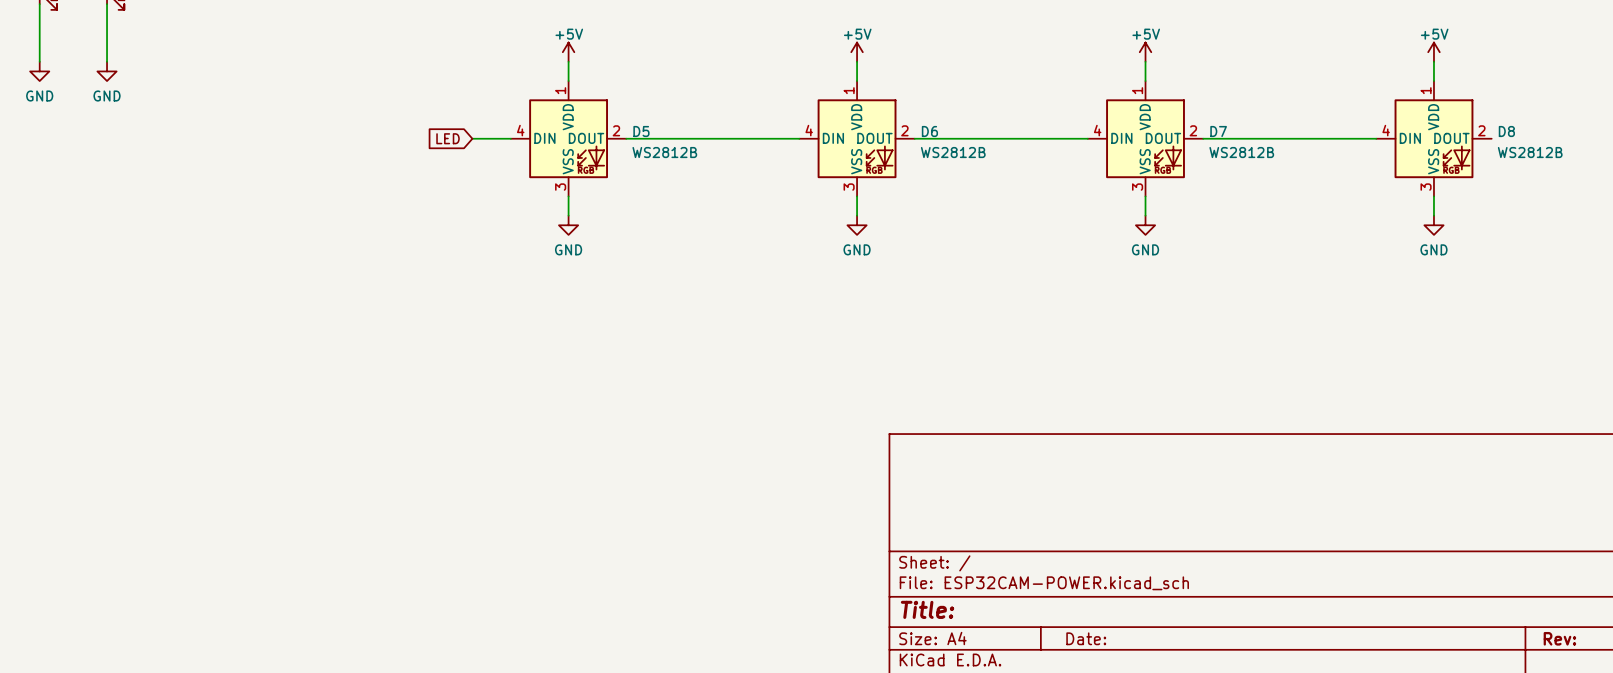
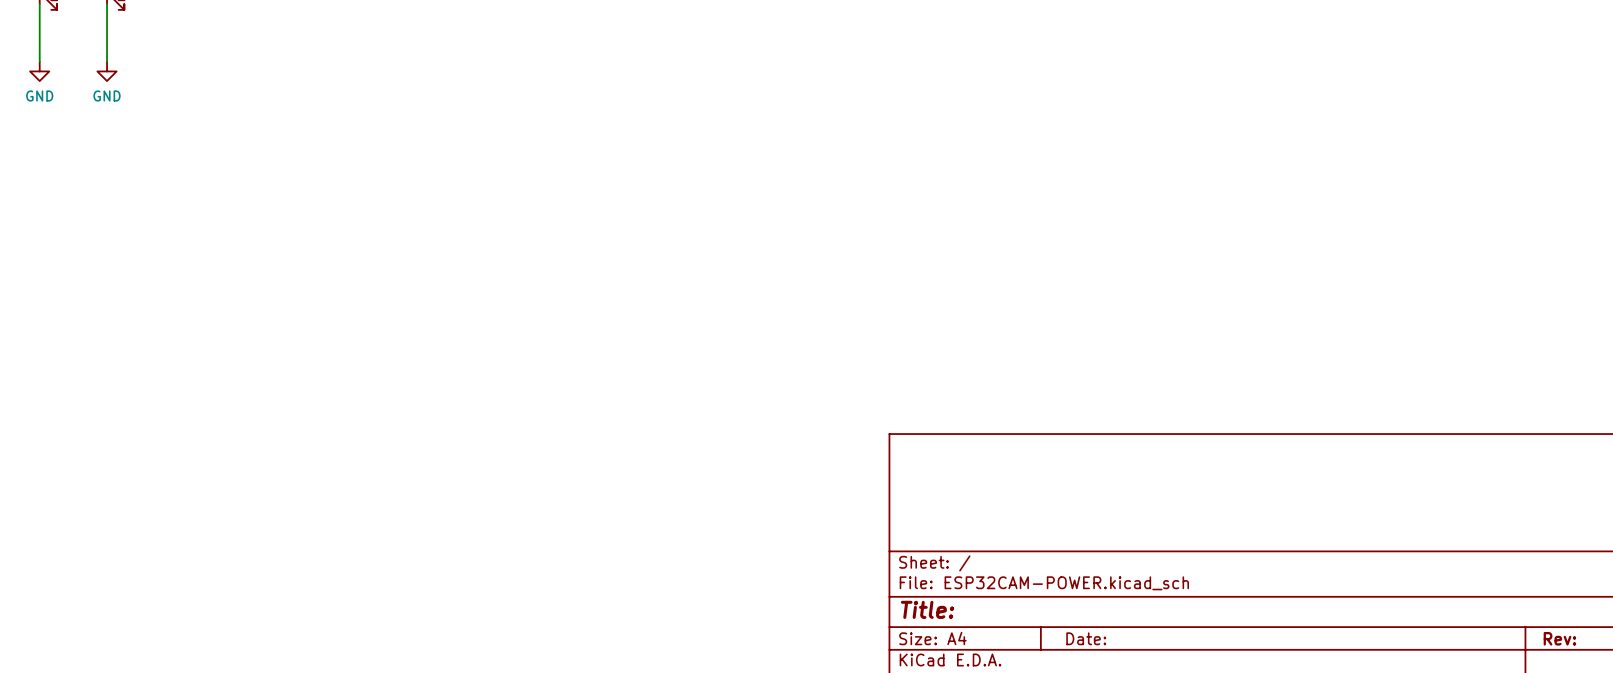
power symbol: +5V (568, 52) -> none
power symbol: +5V (857, 52) -> none
power symbol: +5V (1145, 52) -> none
power symbol: +5V (1433, 52) -> none
wire: (568, 61) (568, 81) -> none
wire: (857, 61) (857, 81) -> none
wire: (1145, 61) (1145, 81) -> none
wire: (1433, 61) (1433, 81) -> none
global label: LED (448, 138) -> none
wire: (472, 138) (510, 138) -> none
D5: WS2812B (568, 138) -> none
wire: (626, 138) (799, 138) -> none
D6: WS2812B (857, 138) -> none
wire: (914, 138) (1087, 138) -> none
D7: WS2812B (1145, 138) -> none
wire: (1203, 138) (1376, 138) -> none
D8: WS2812B (1433, 138) -> none
wire: (568, 196) (568, 215) -> none
wire: (857, 196) (857, 215) -> none
wire: (1145, 196) (1145, 215) -> none
wire: (1433, 196) (1433, 215) -> none
power symbol: GND (568, 225) -> none
power symbol: GND (857, 225) -> none
power symbol: GND (1145, 225) -> none
power symbol: GND (1433, 225) -> none

